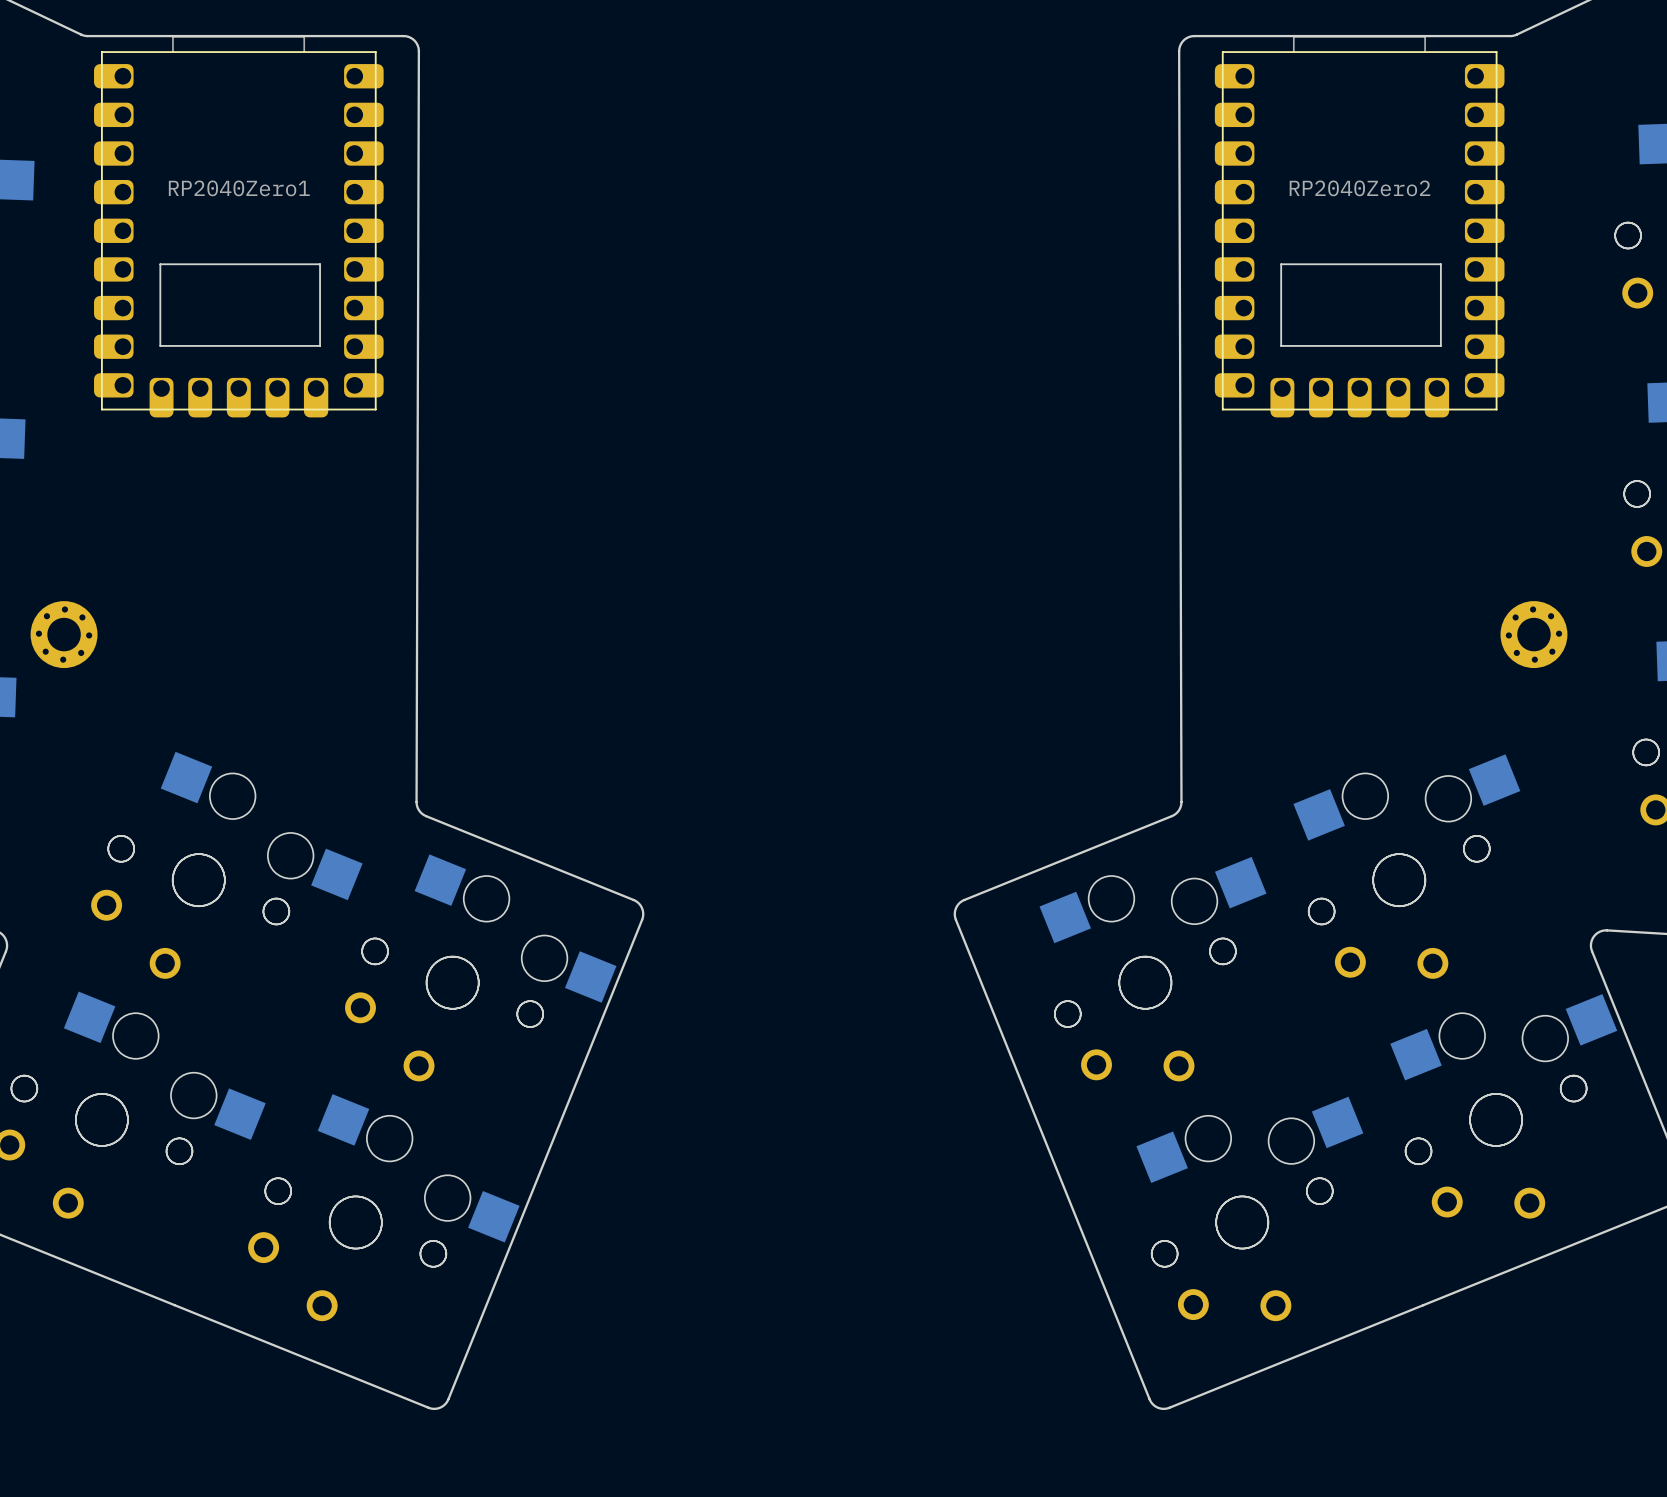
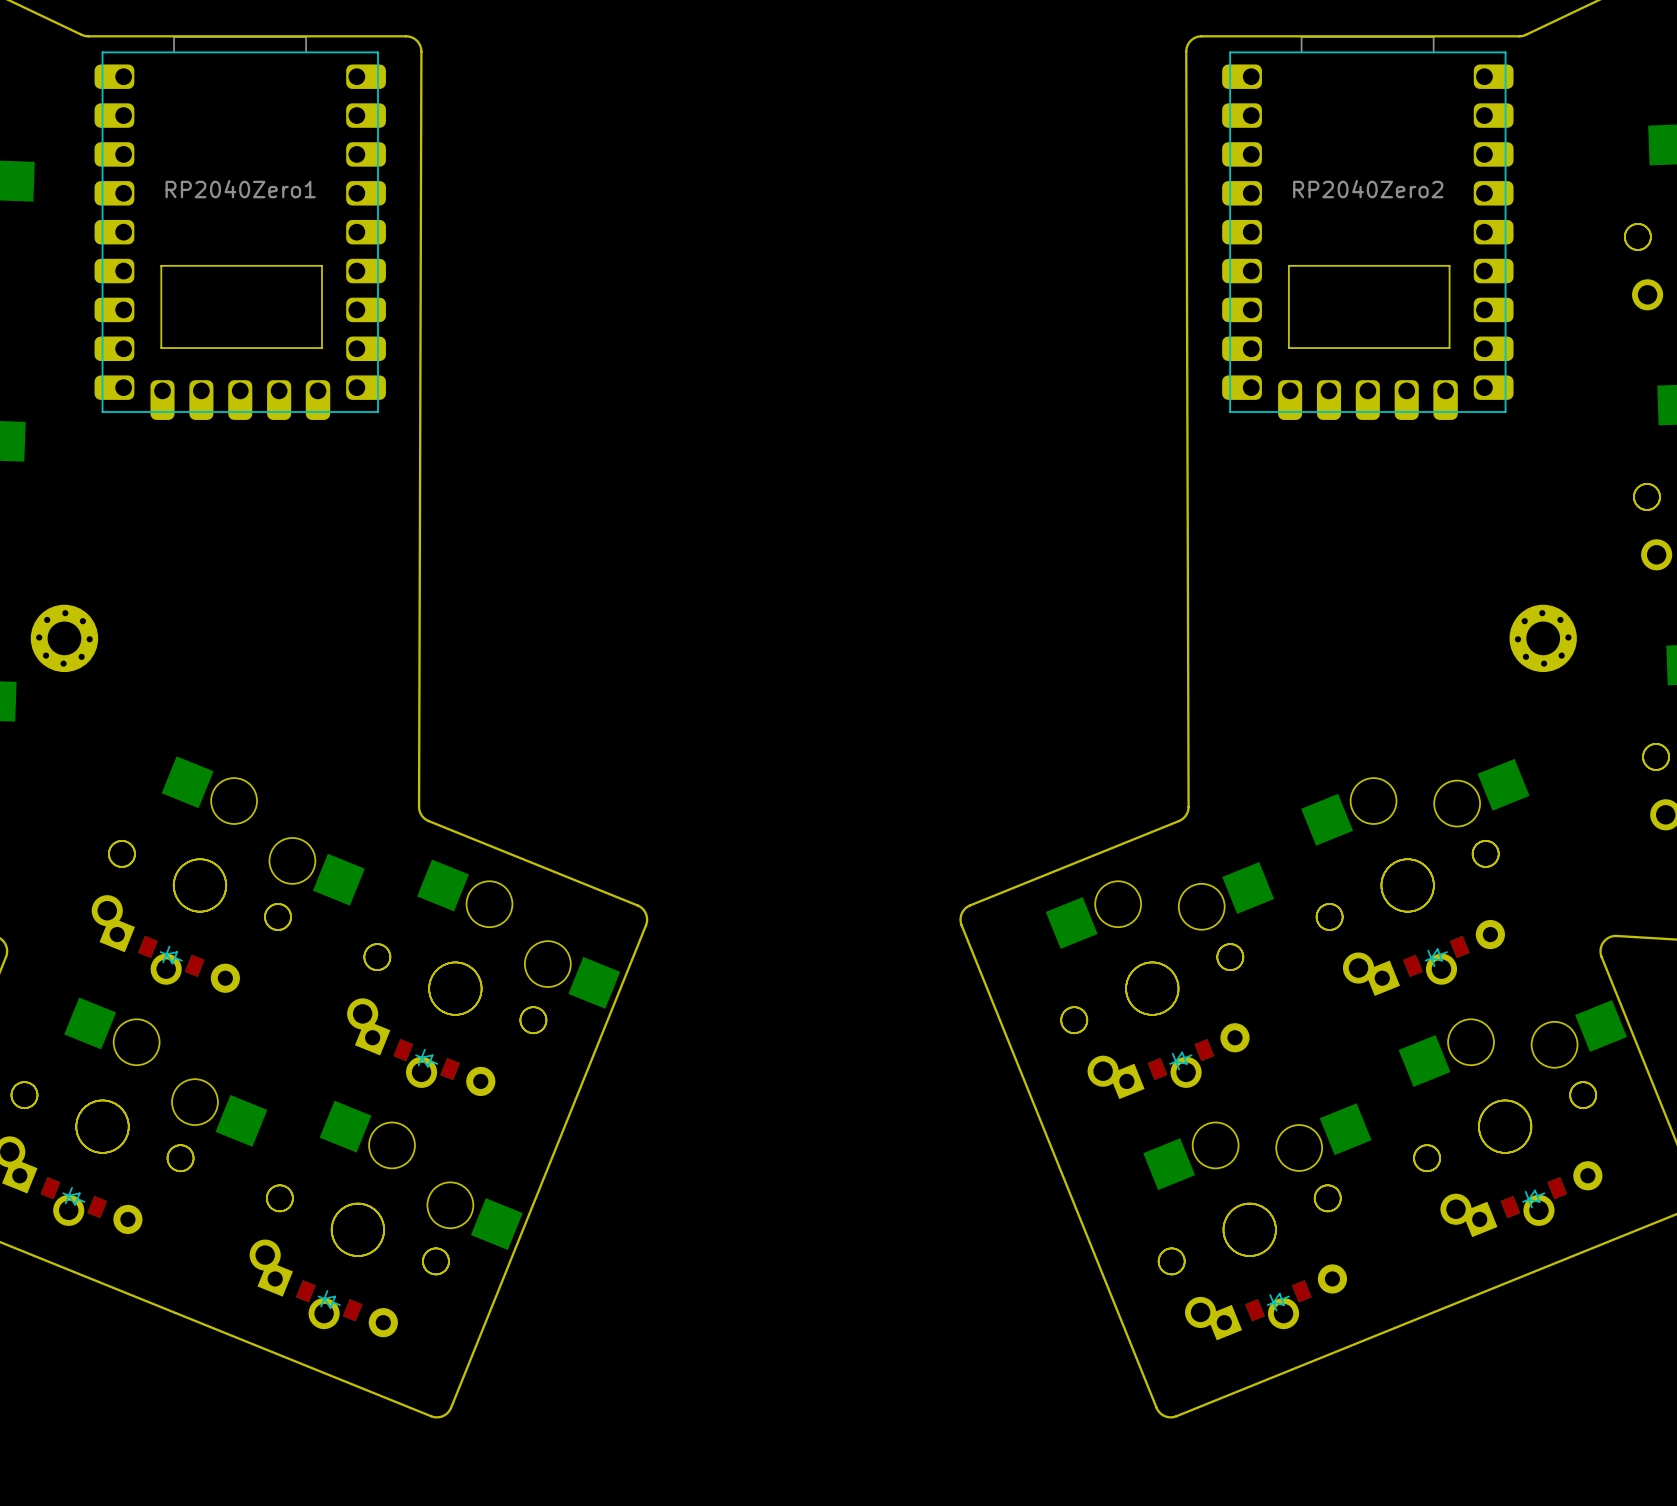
part: none -> (169, 954)
part: none -> (1434, 957)
part: none -> (425, 1058)
part: none -> (1179, 1061)
part: none -> (72, 1196)
part: none -> (1532, 1199)
part: none -> (327, 1299)
part: none -> (1276, 1302)

